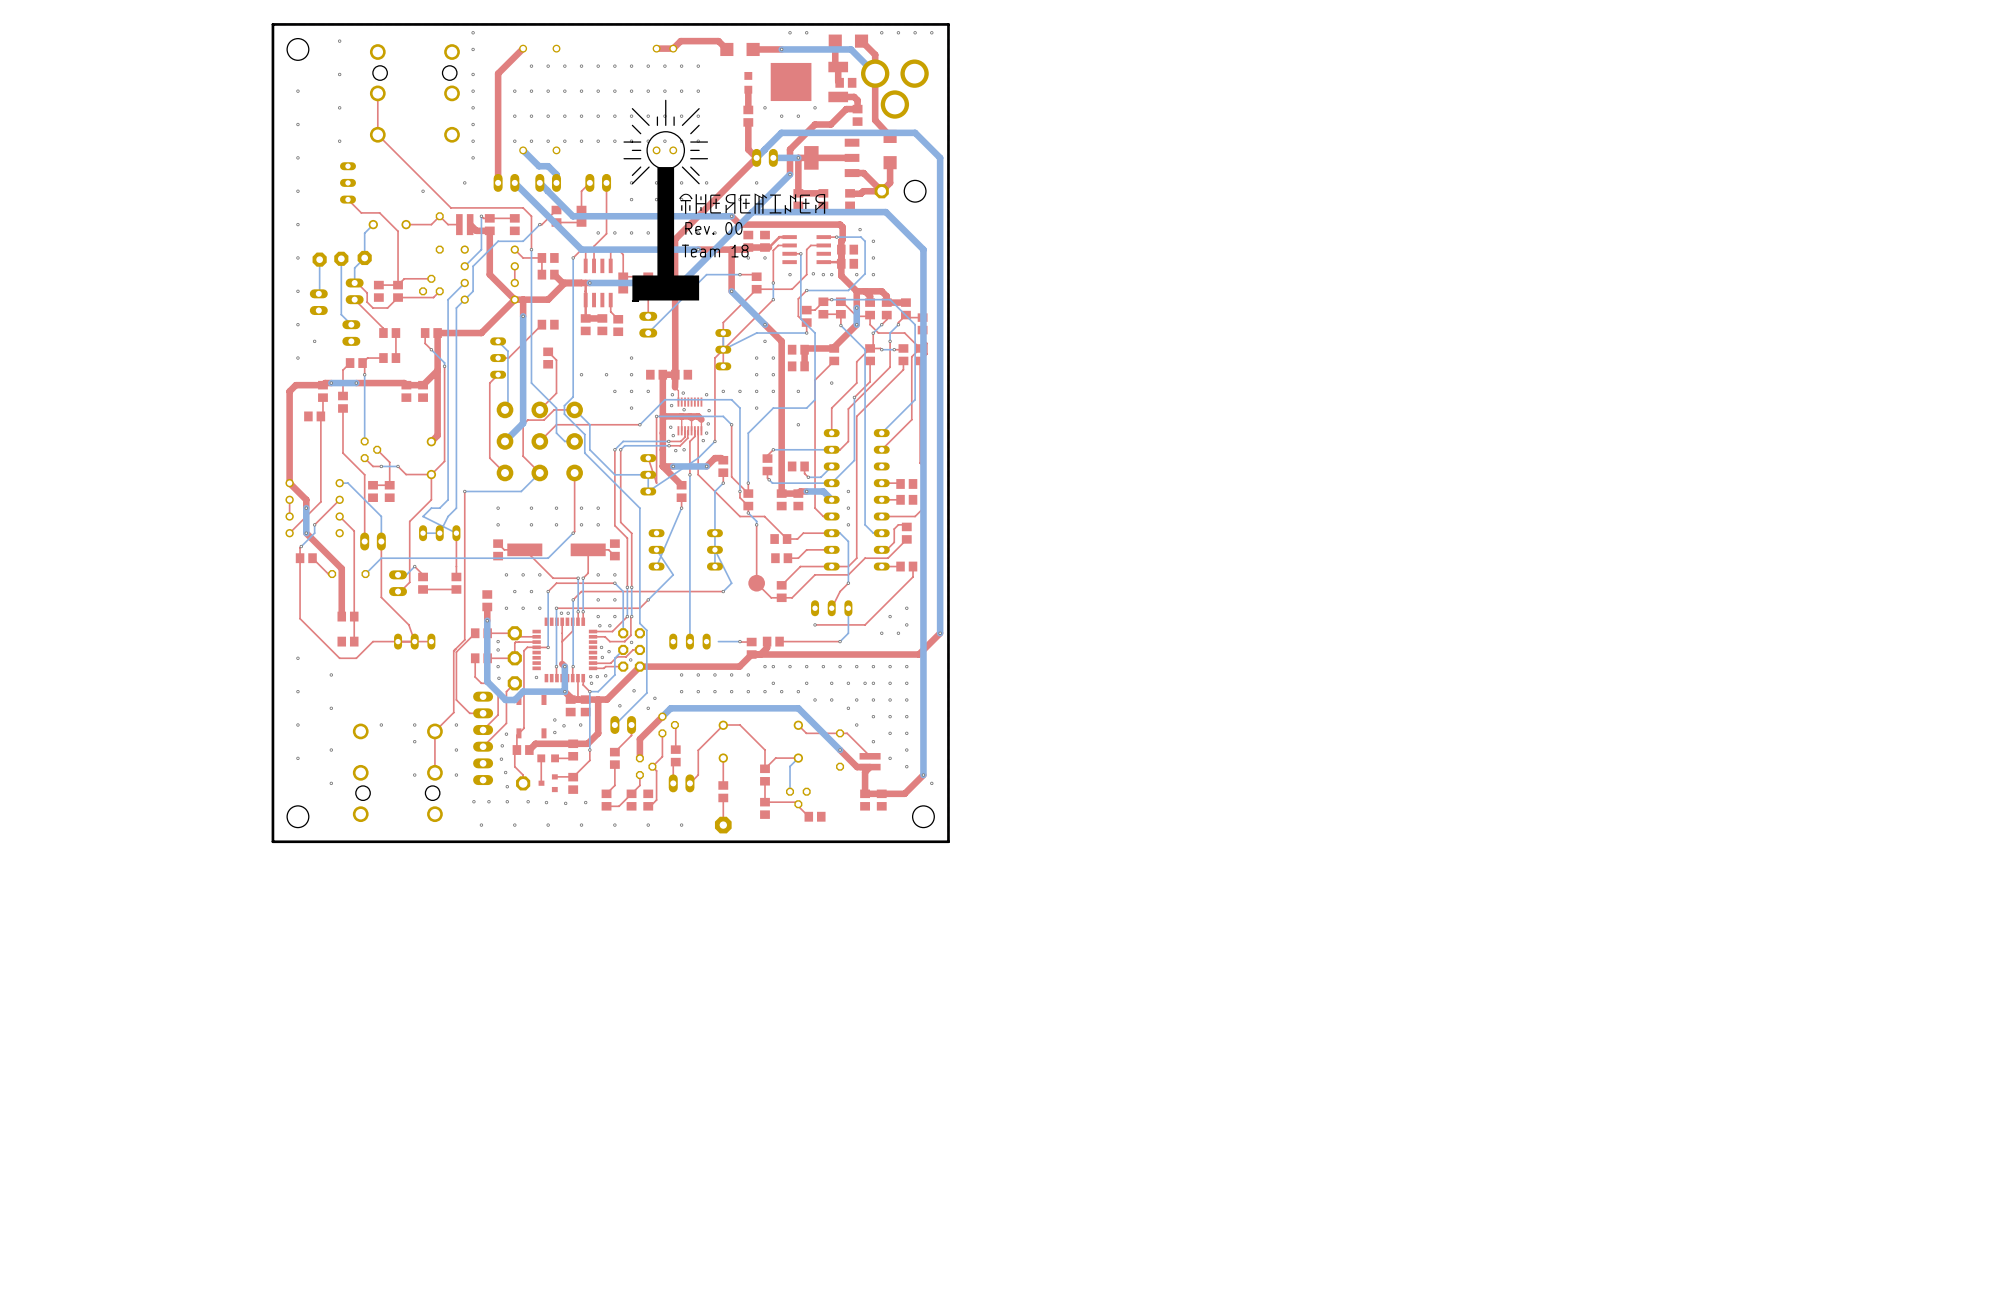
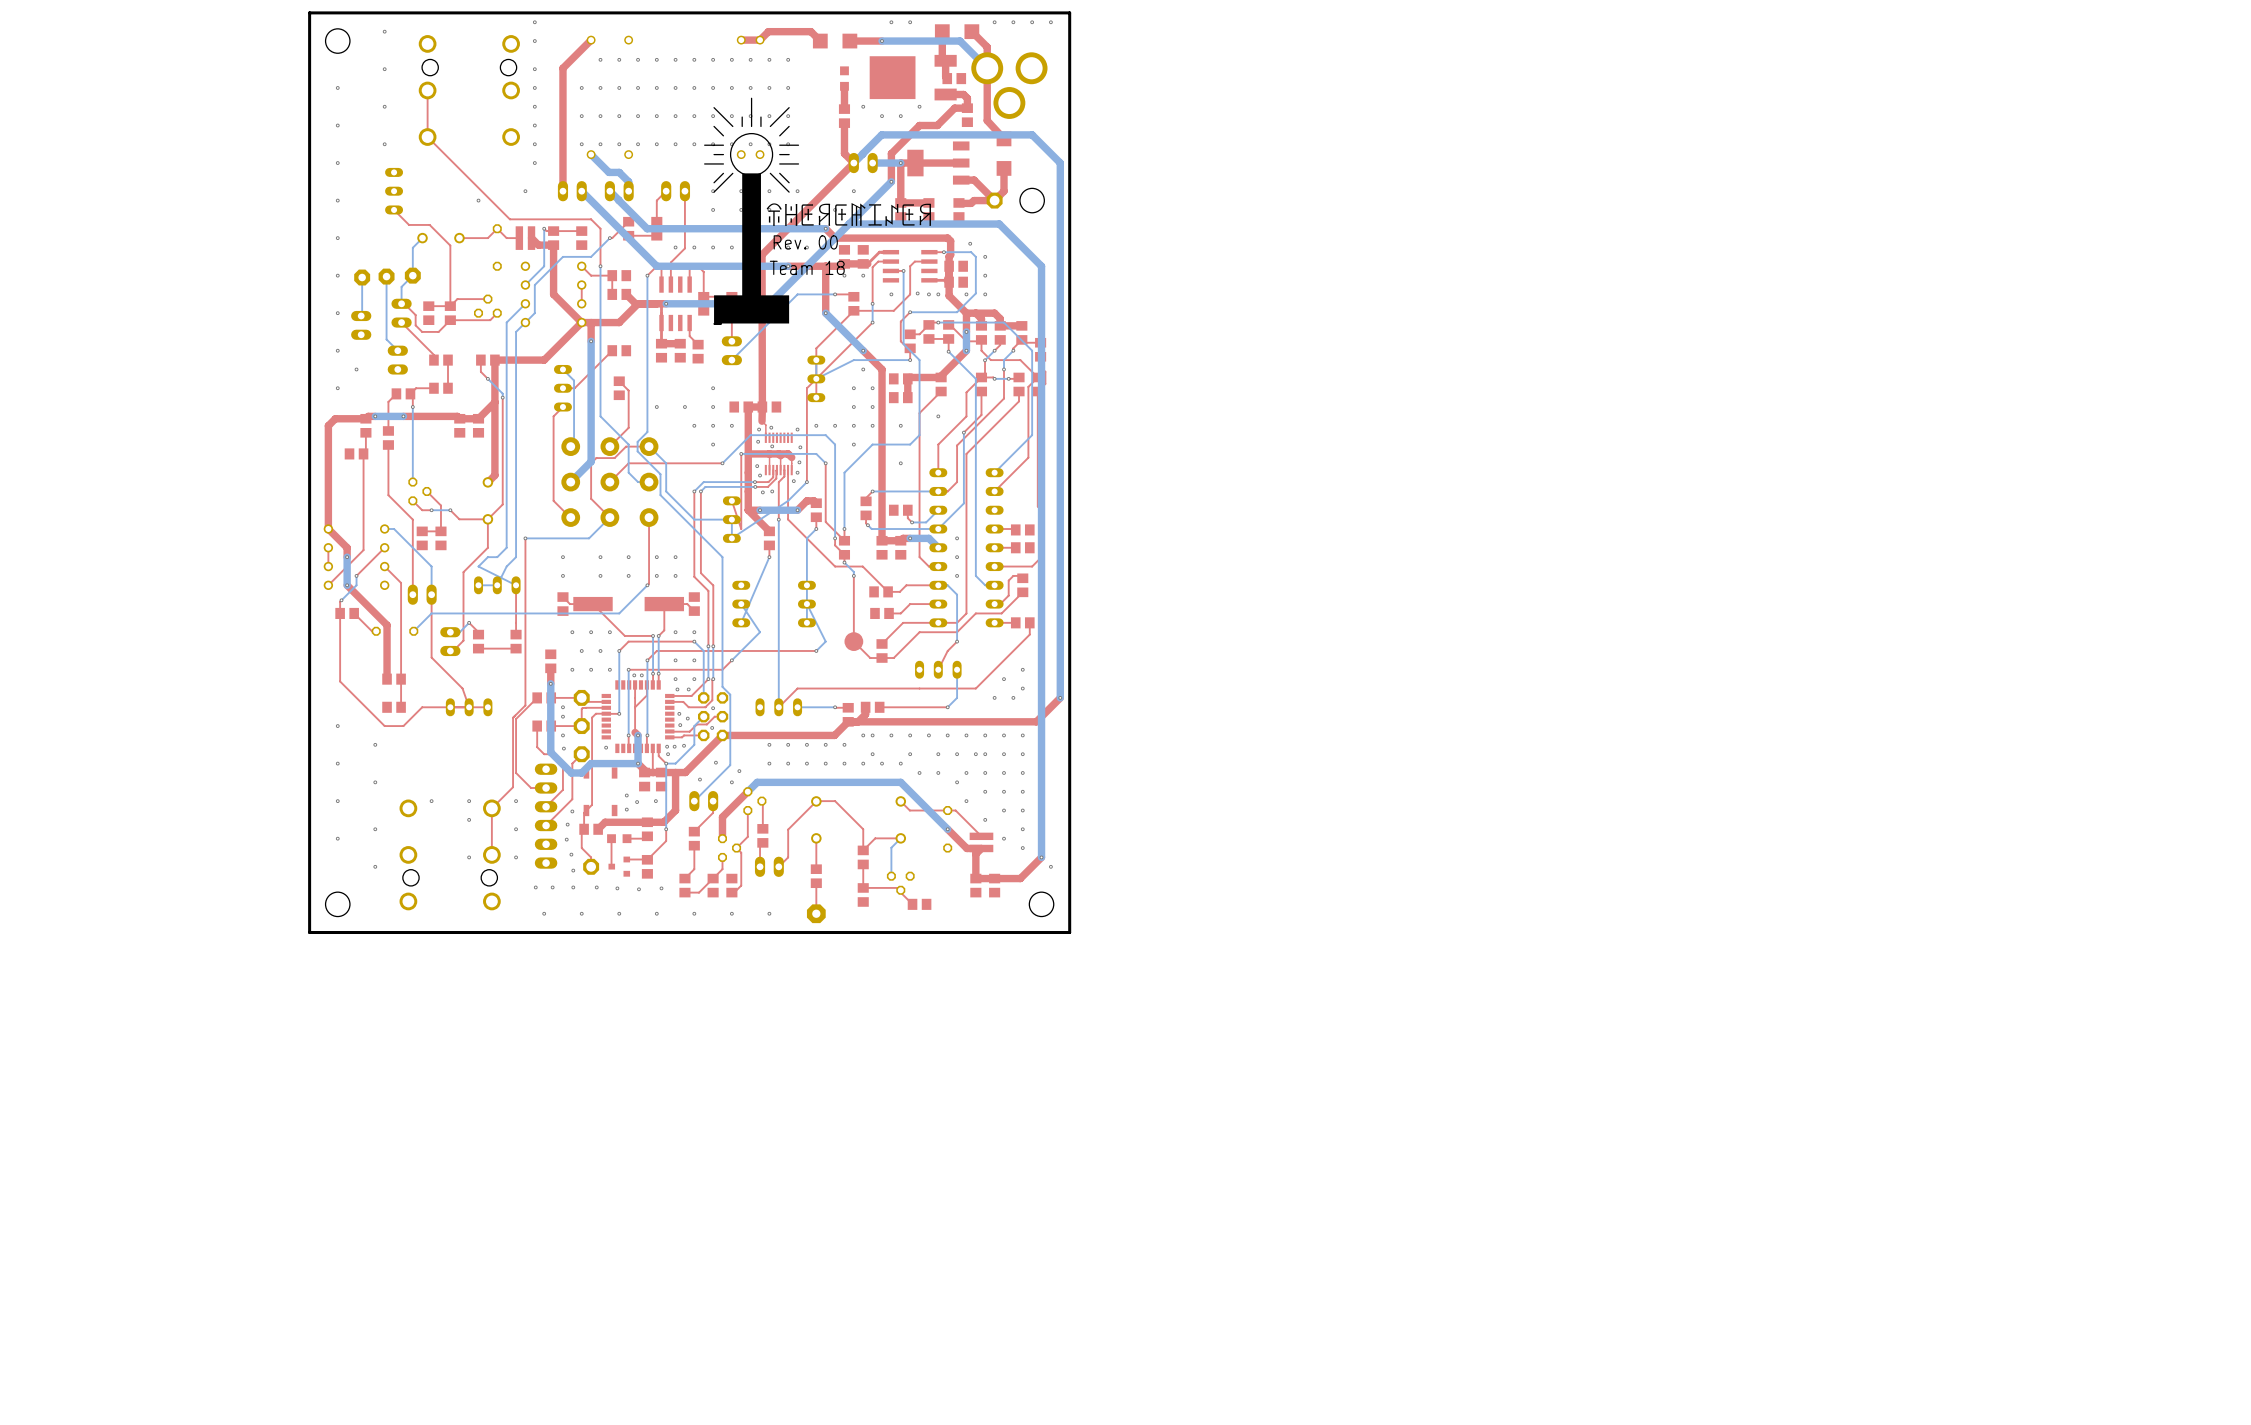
top track: none -> (919, 688) (797, 688) (778, 707)
via: (815, 624) -> none
bottom track: none -> (810, 707) (797, 707)

